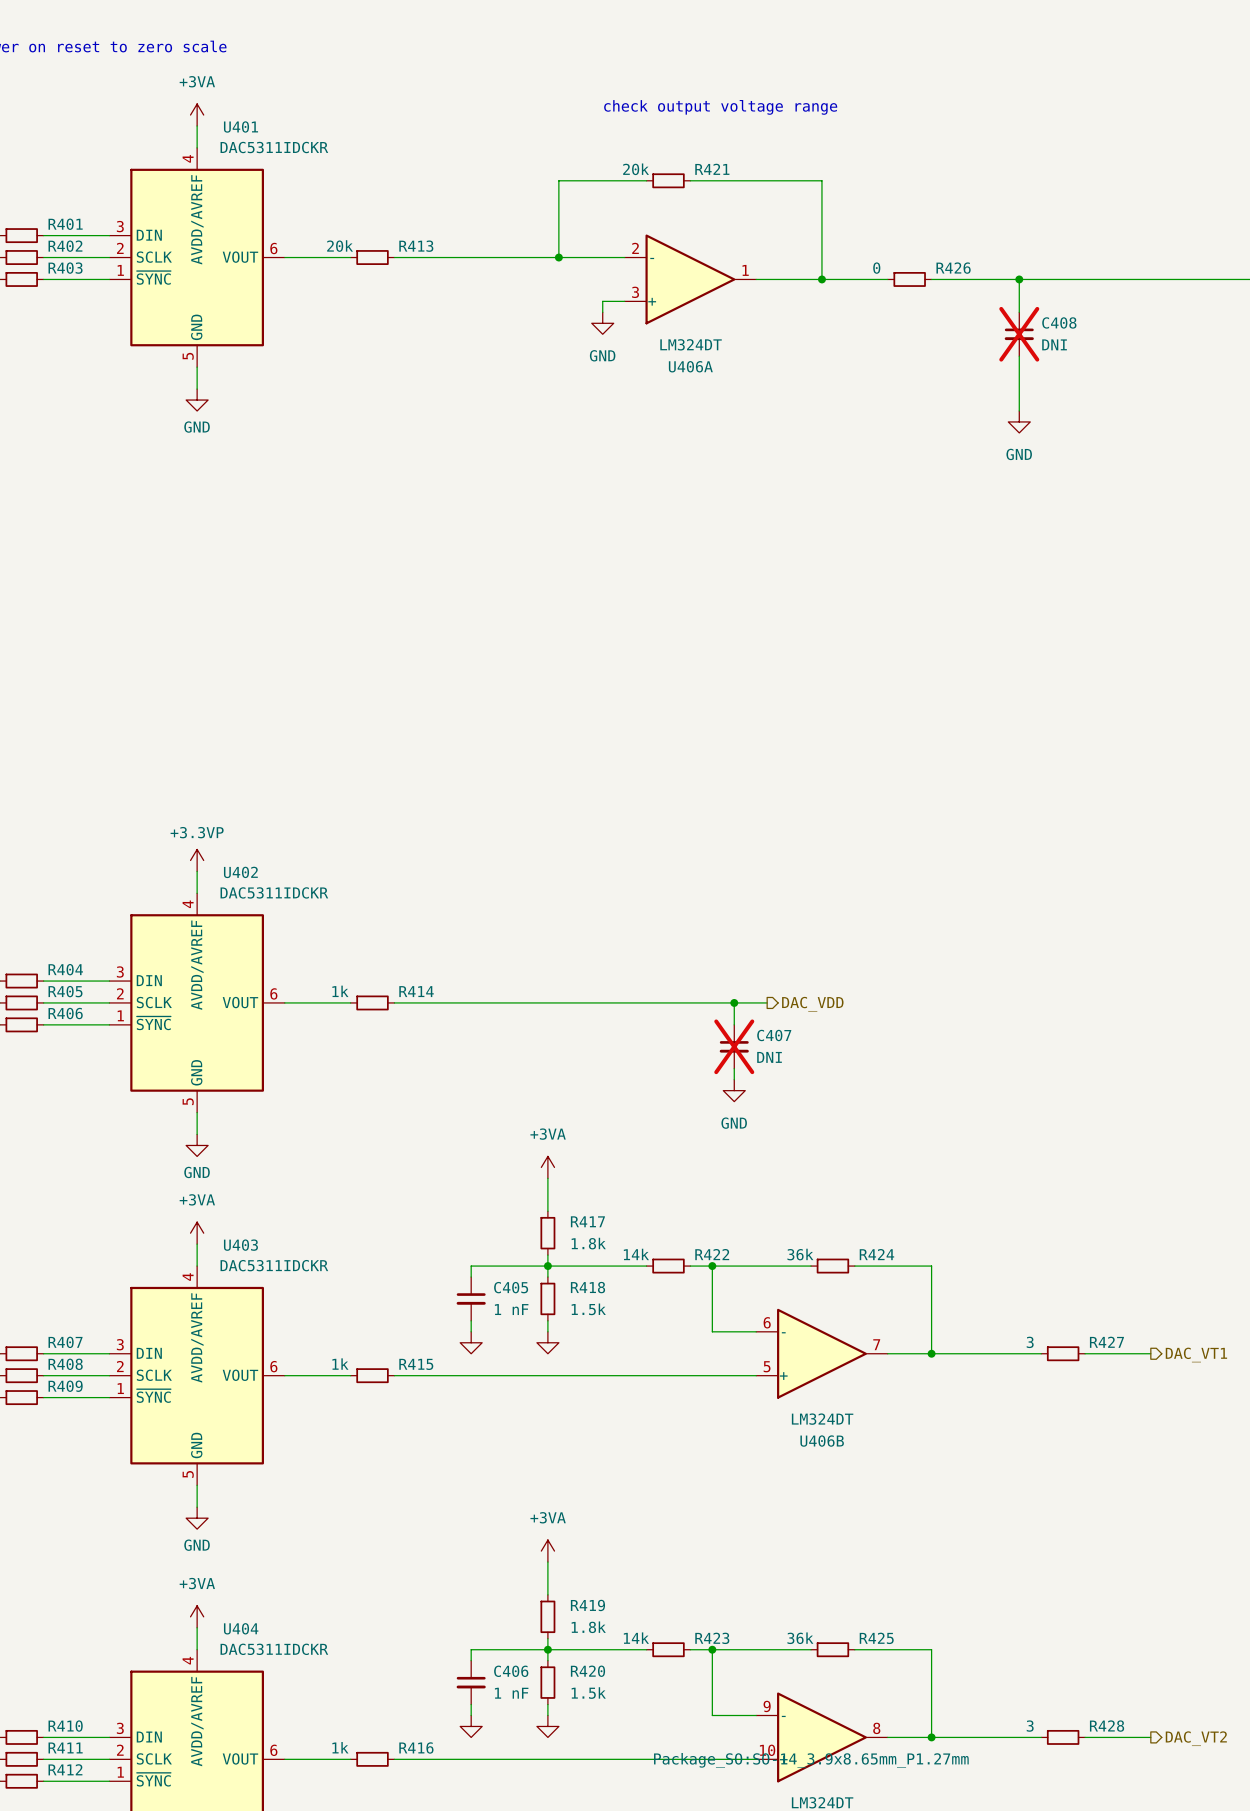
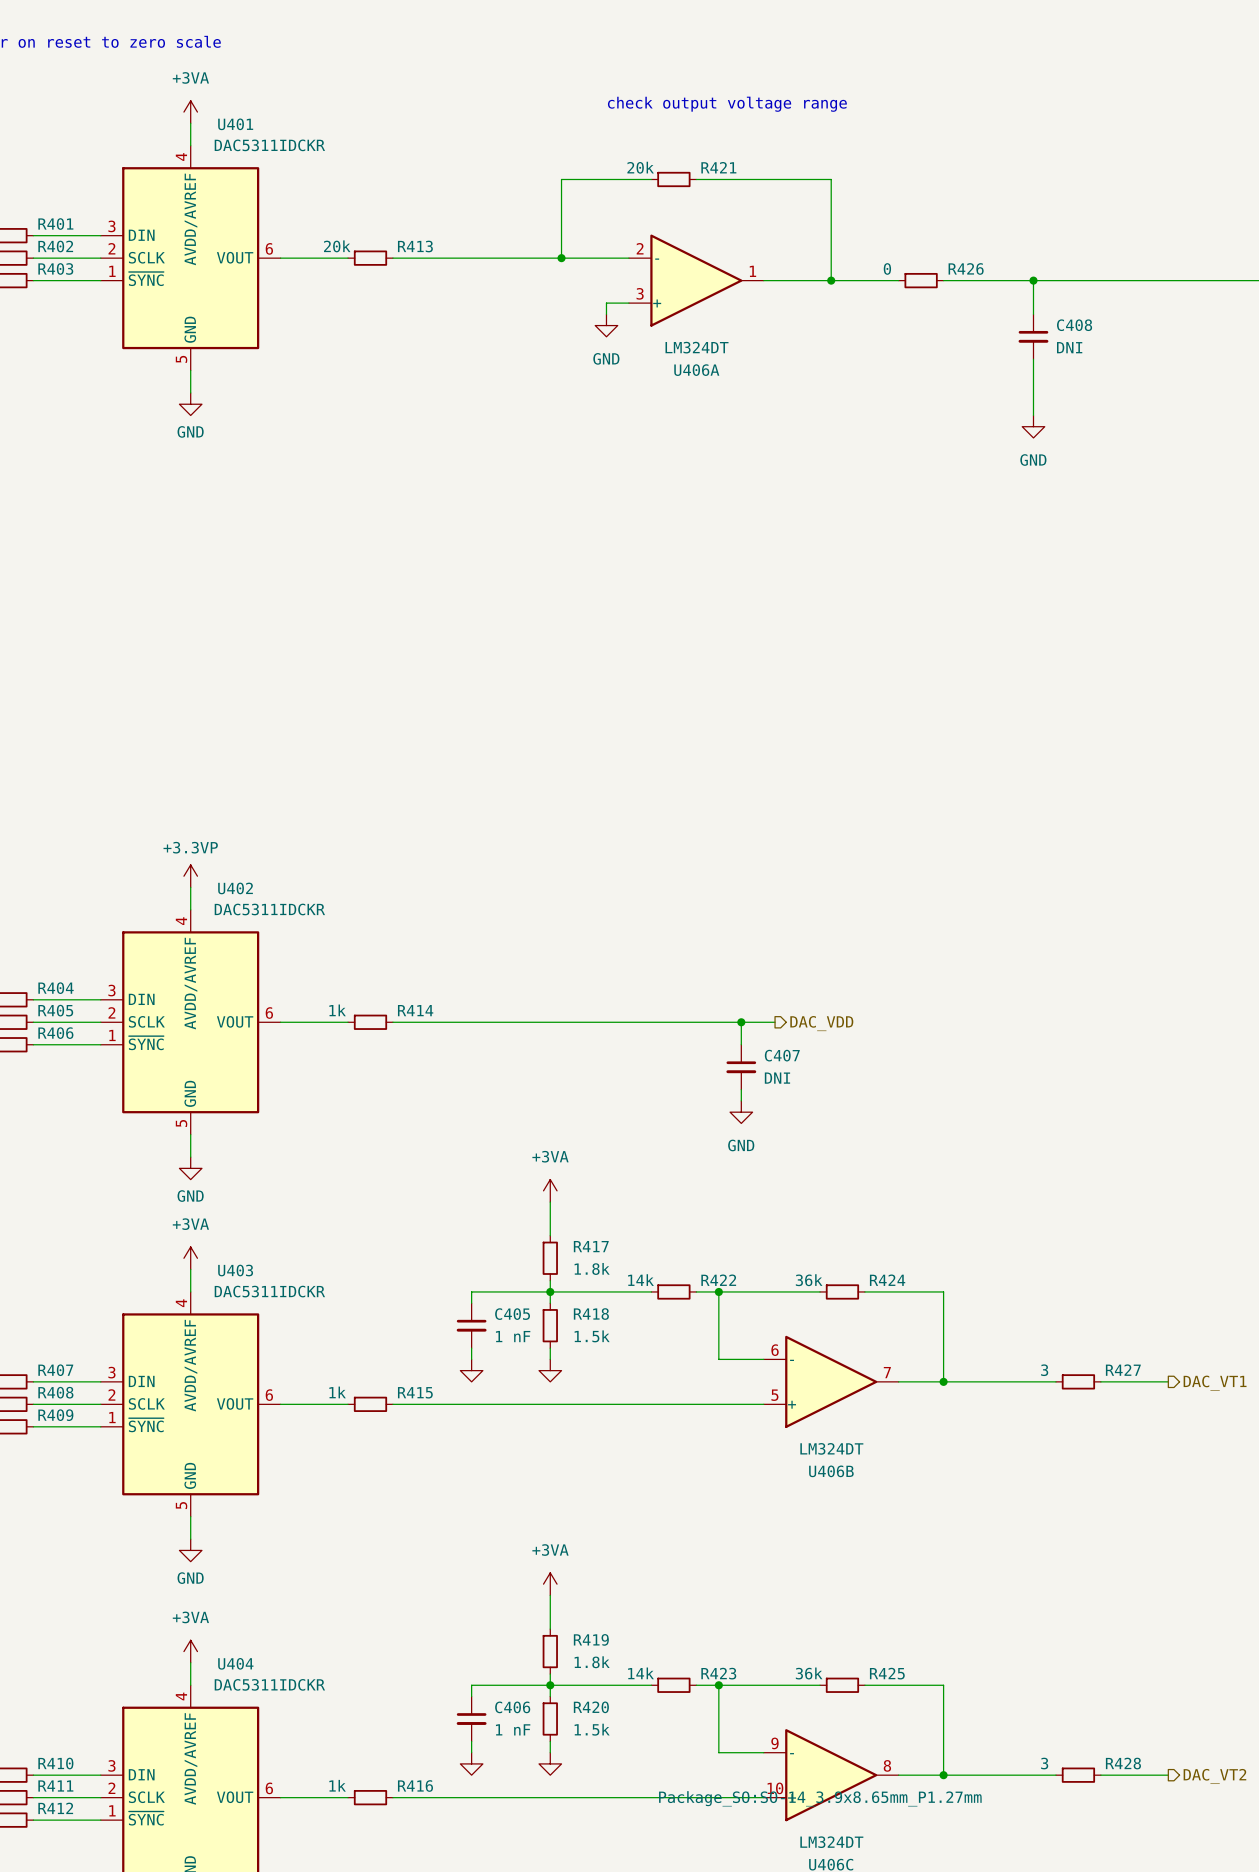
C408 do-not-place cross: (1019, 334) -> none
C407 do-not-place cross: (734, 1046) -> none

